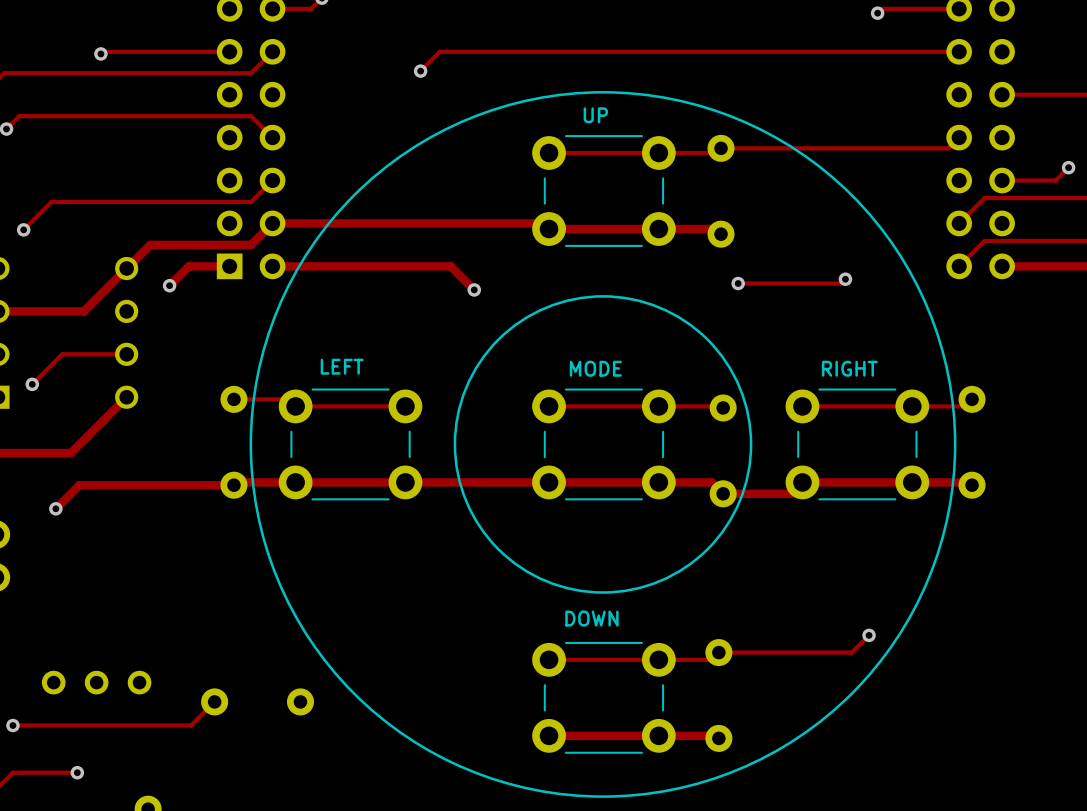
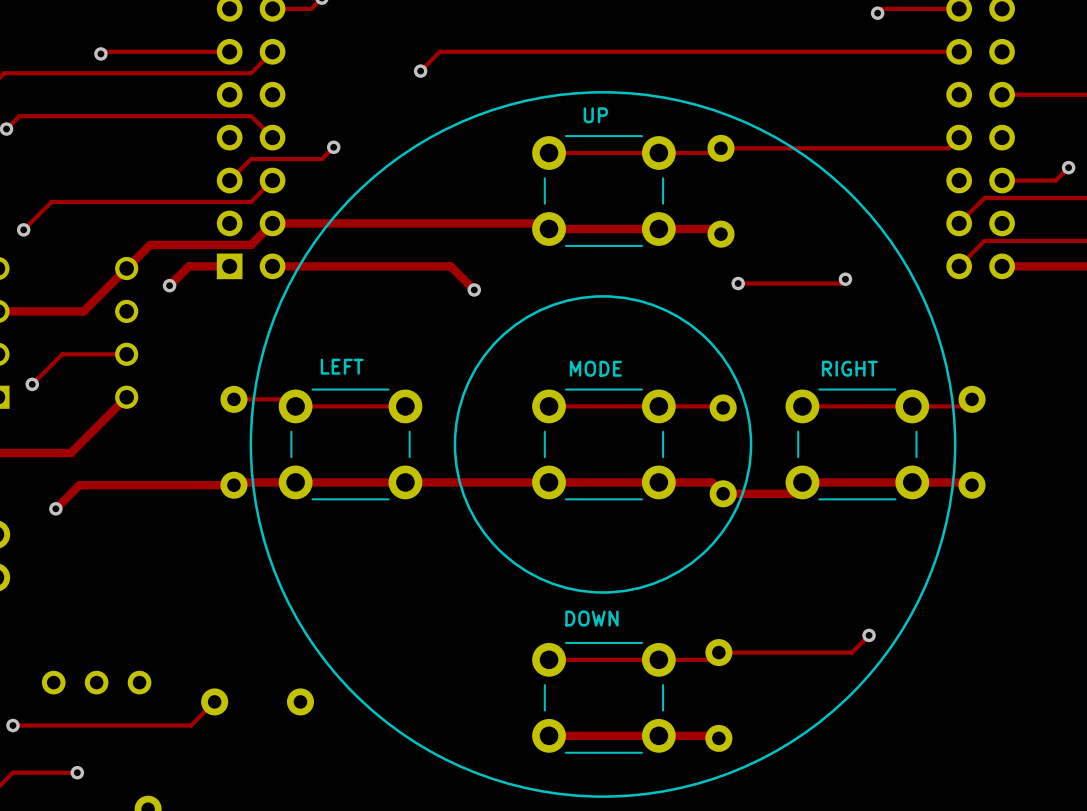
track: none -> (333, 147) (321, 159) (251, 159) (229, 180)
via: none -> (333, 147)

